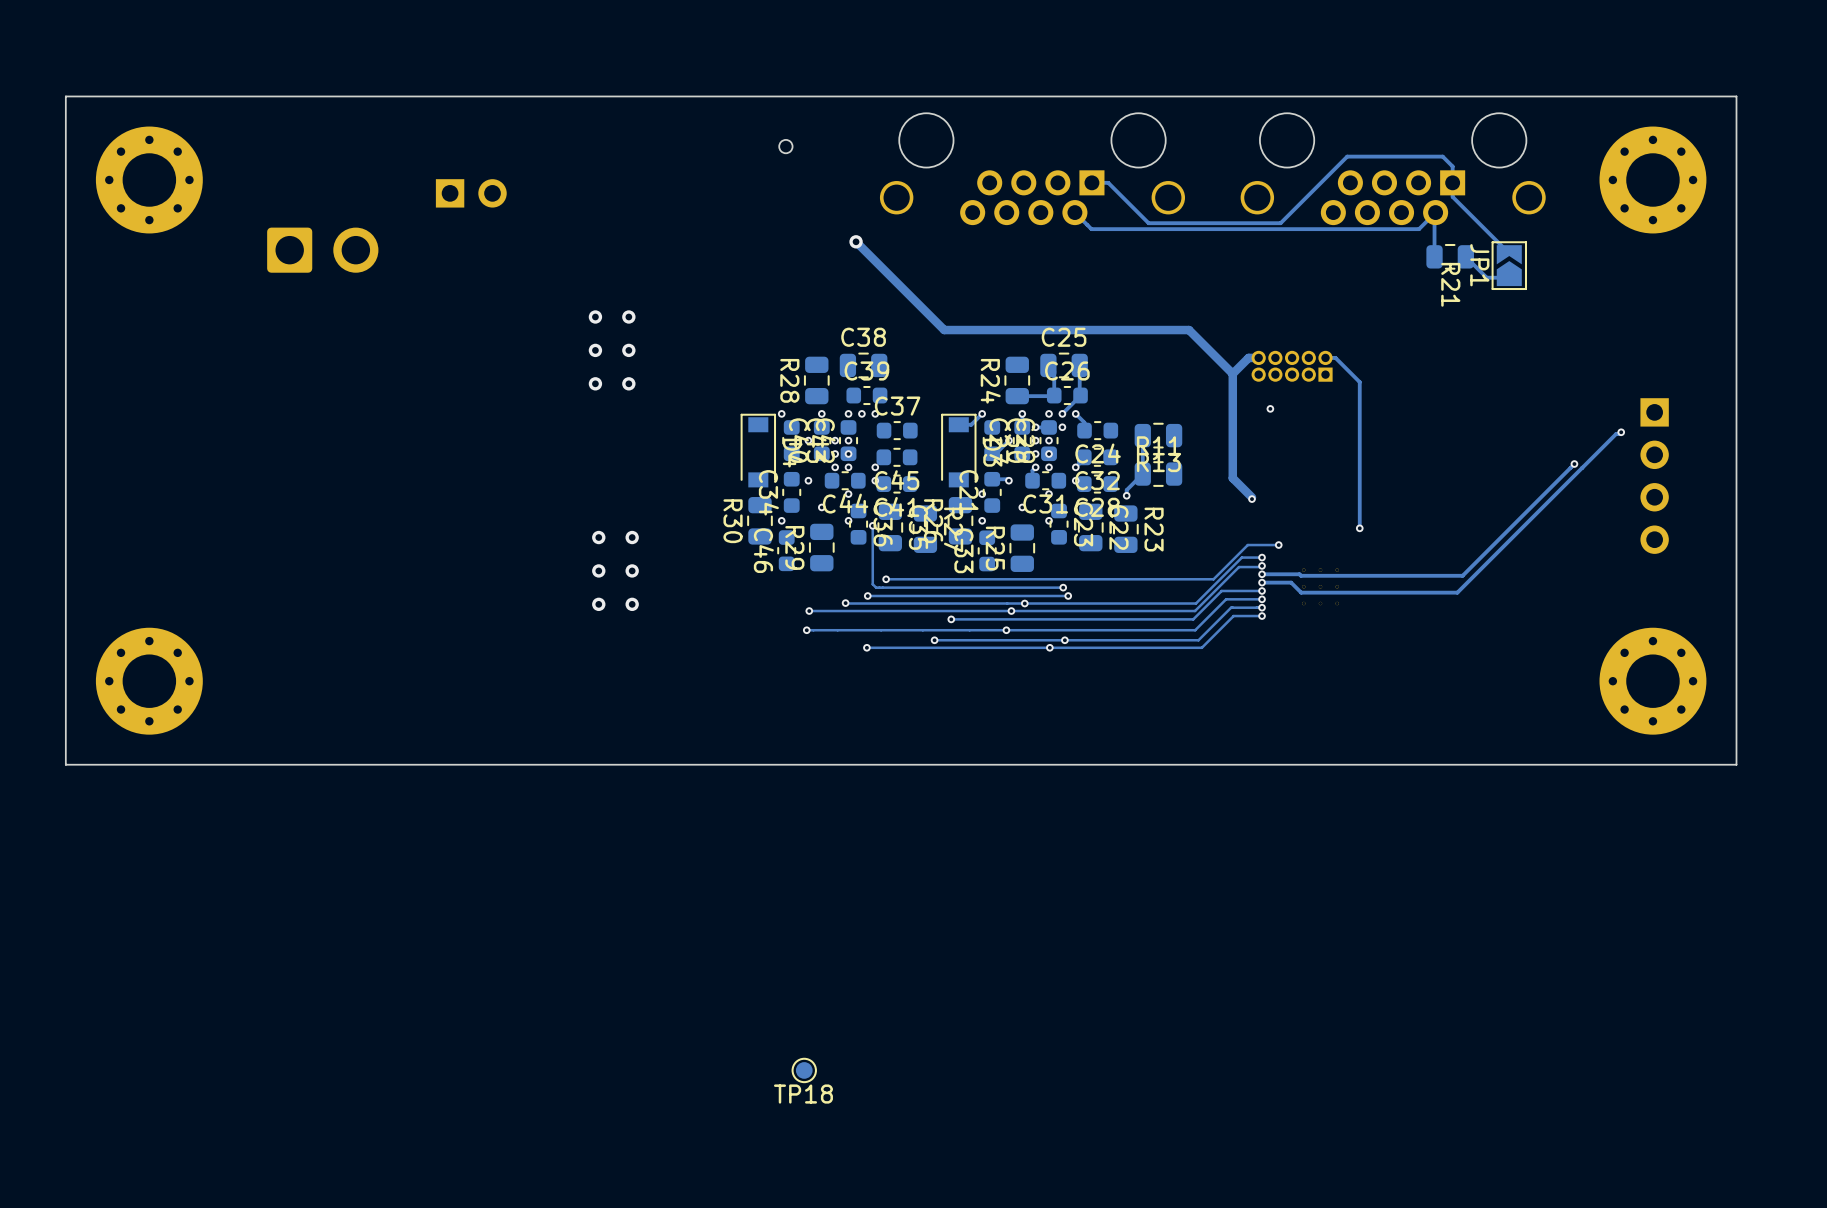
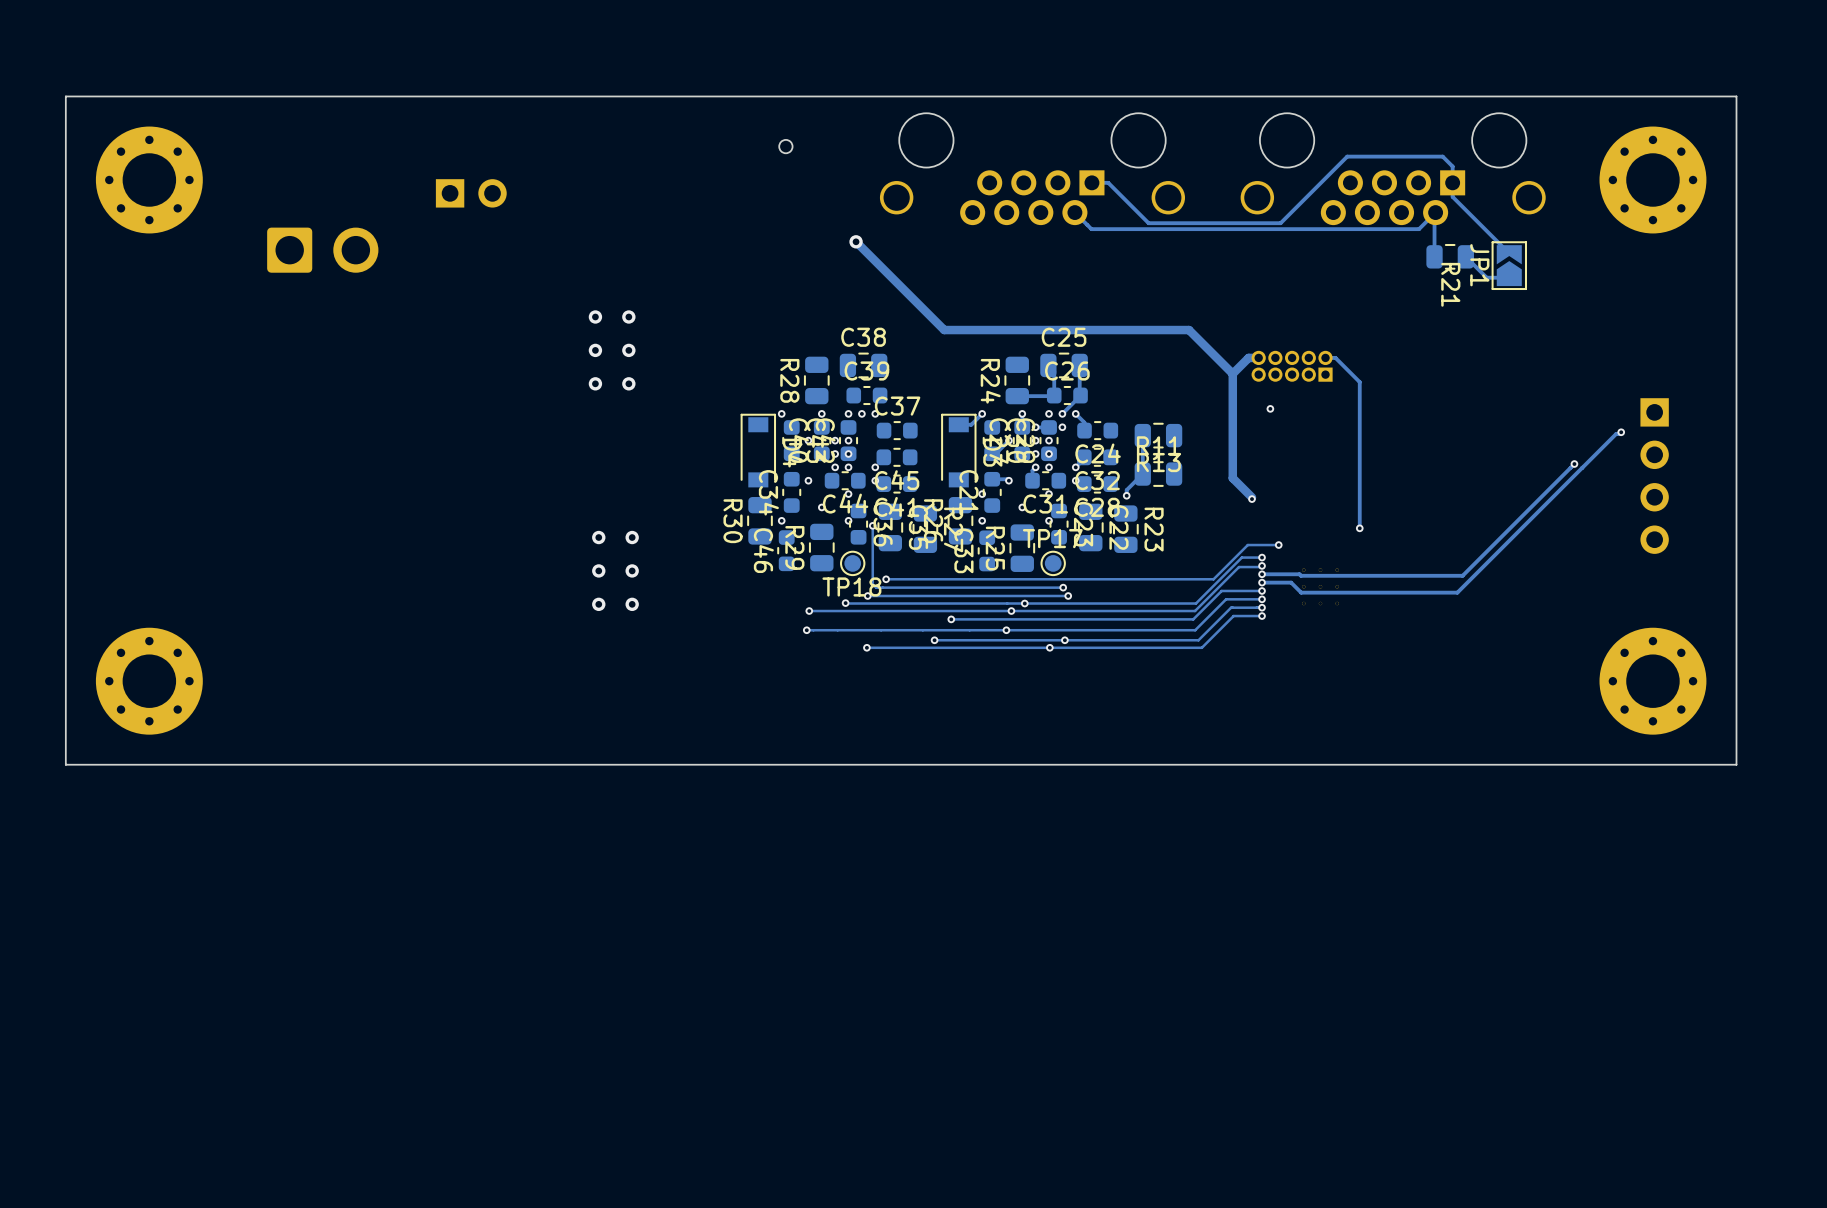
TP17: none -> (1053, 563)
TP18 position: (804, 1070) -> (852, 563)

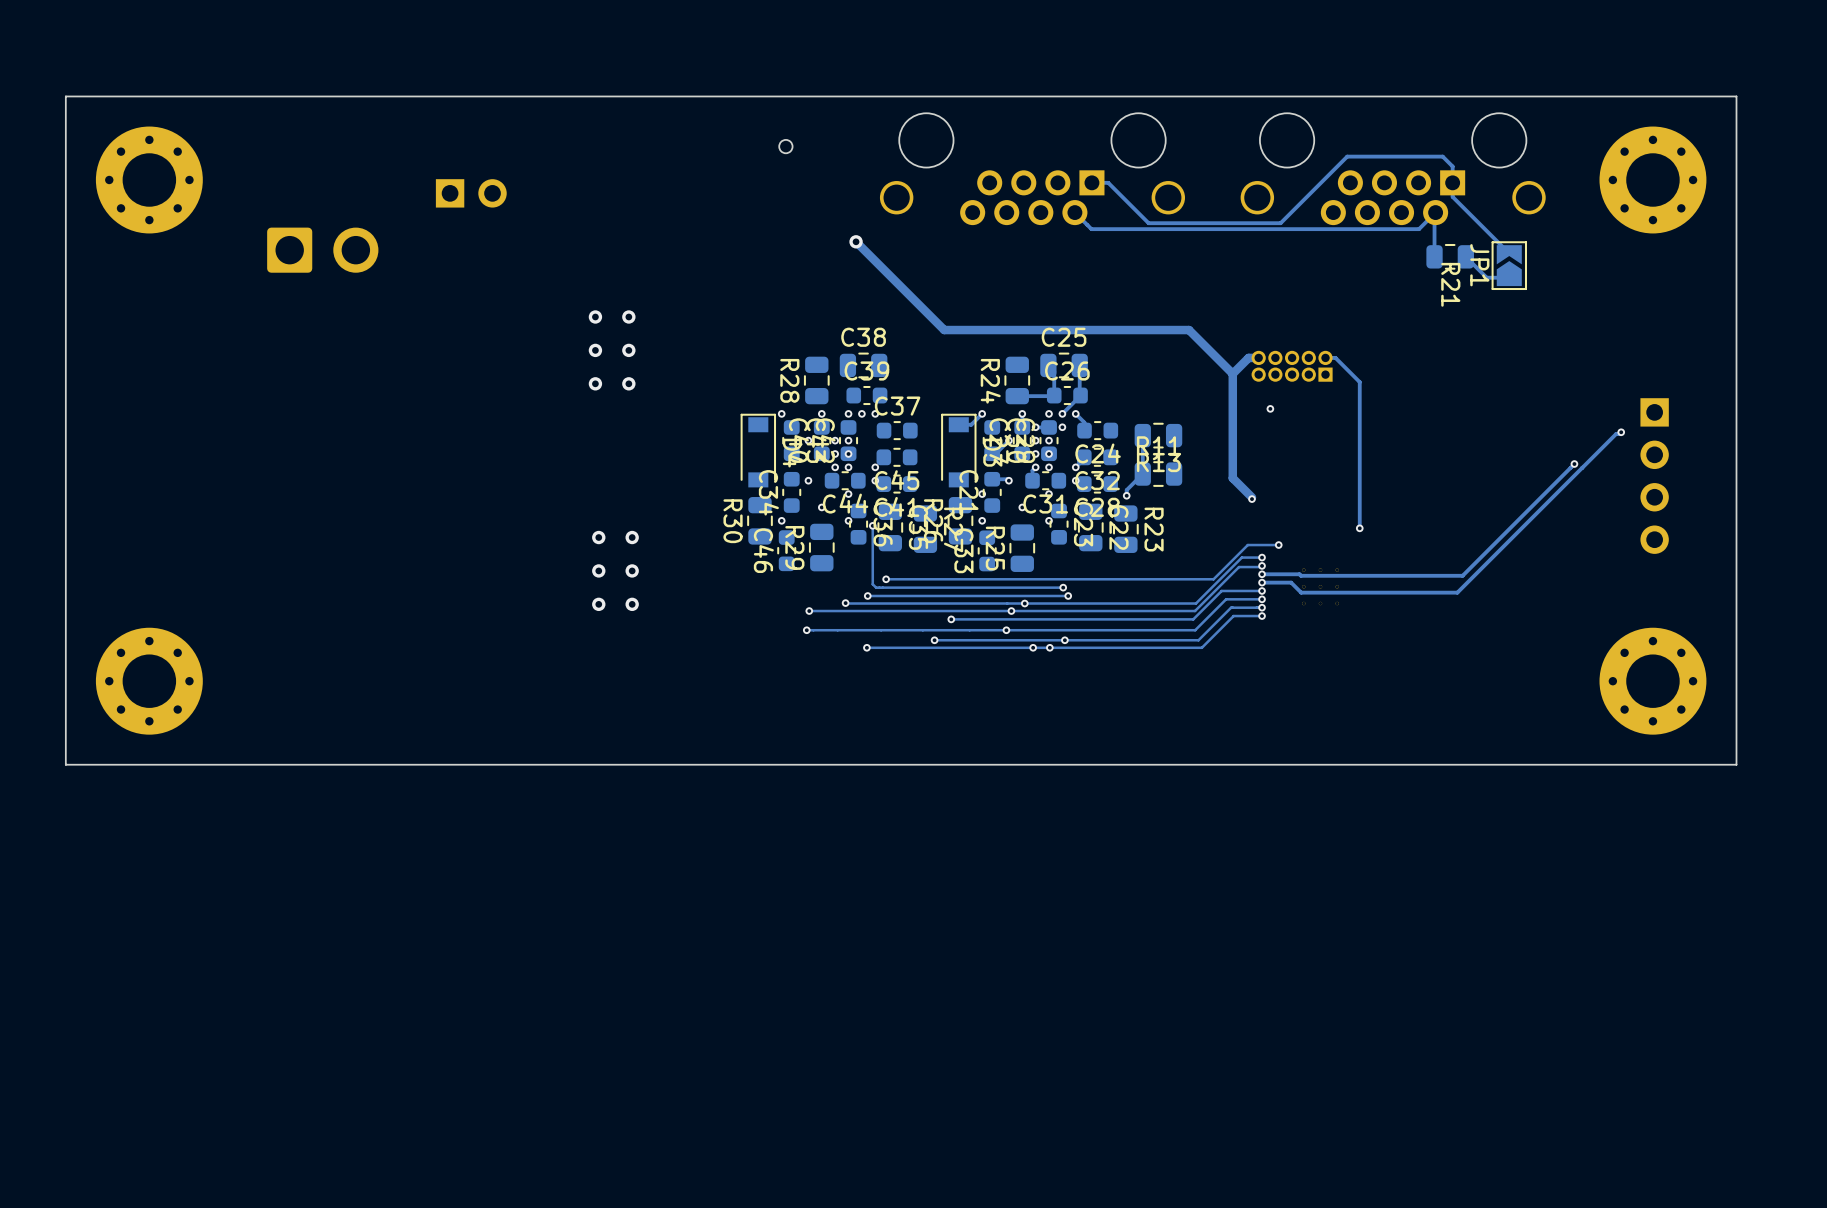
TP18: (852, 563) -> none
TP17: (1053, 563) -> none
via: none -> (1033, 647)

